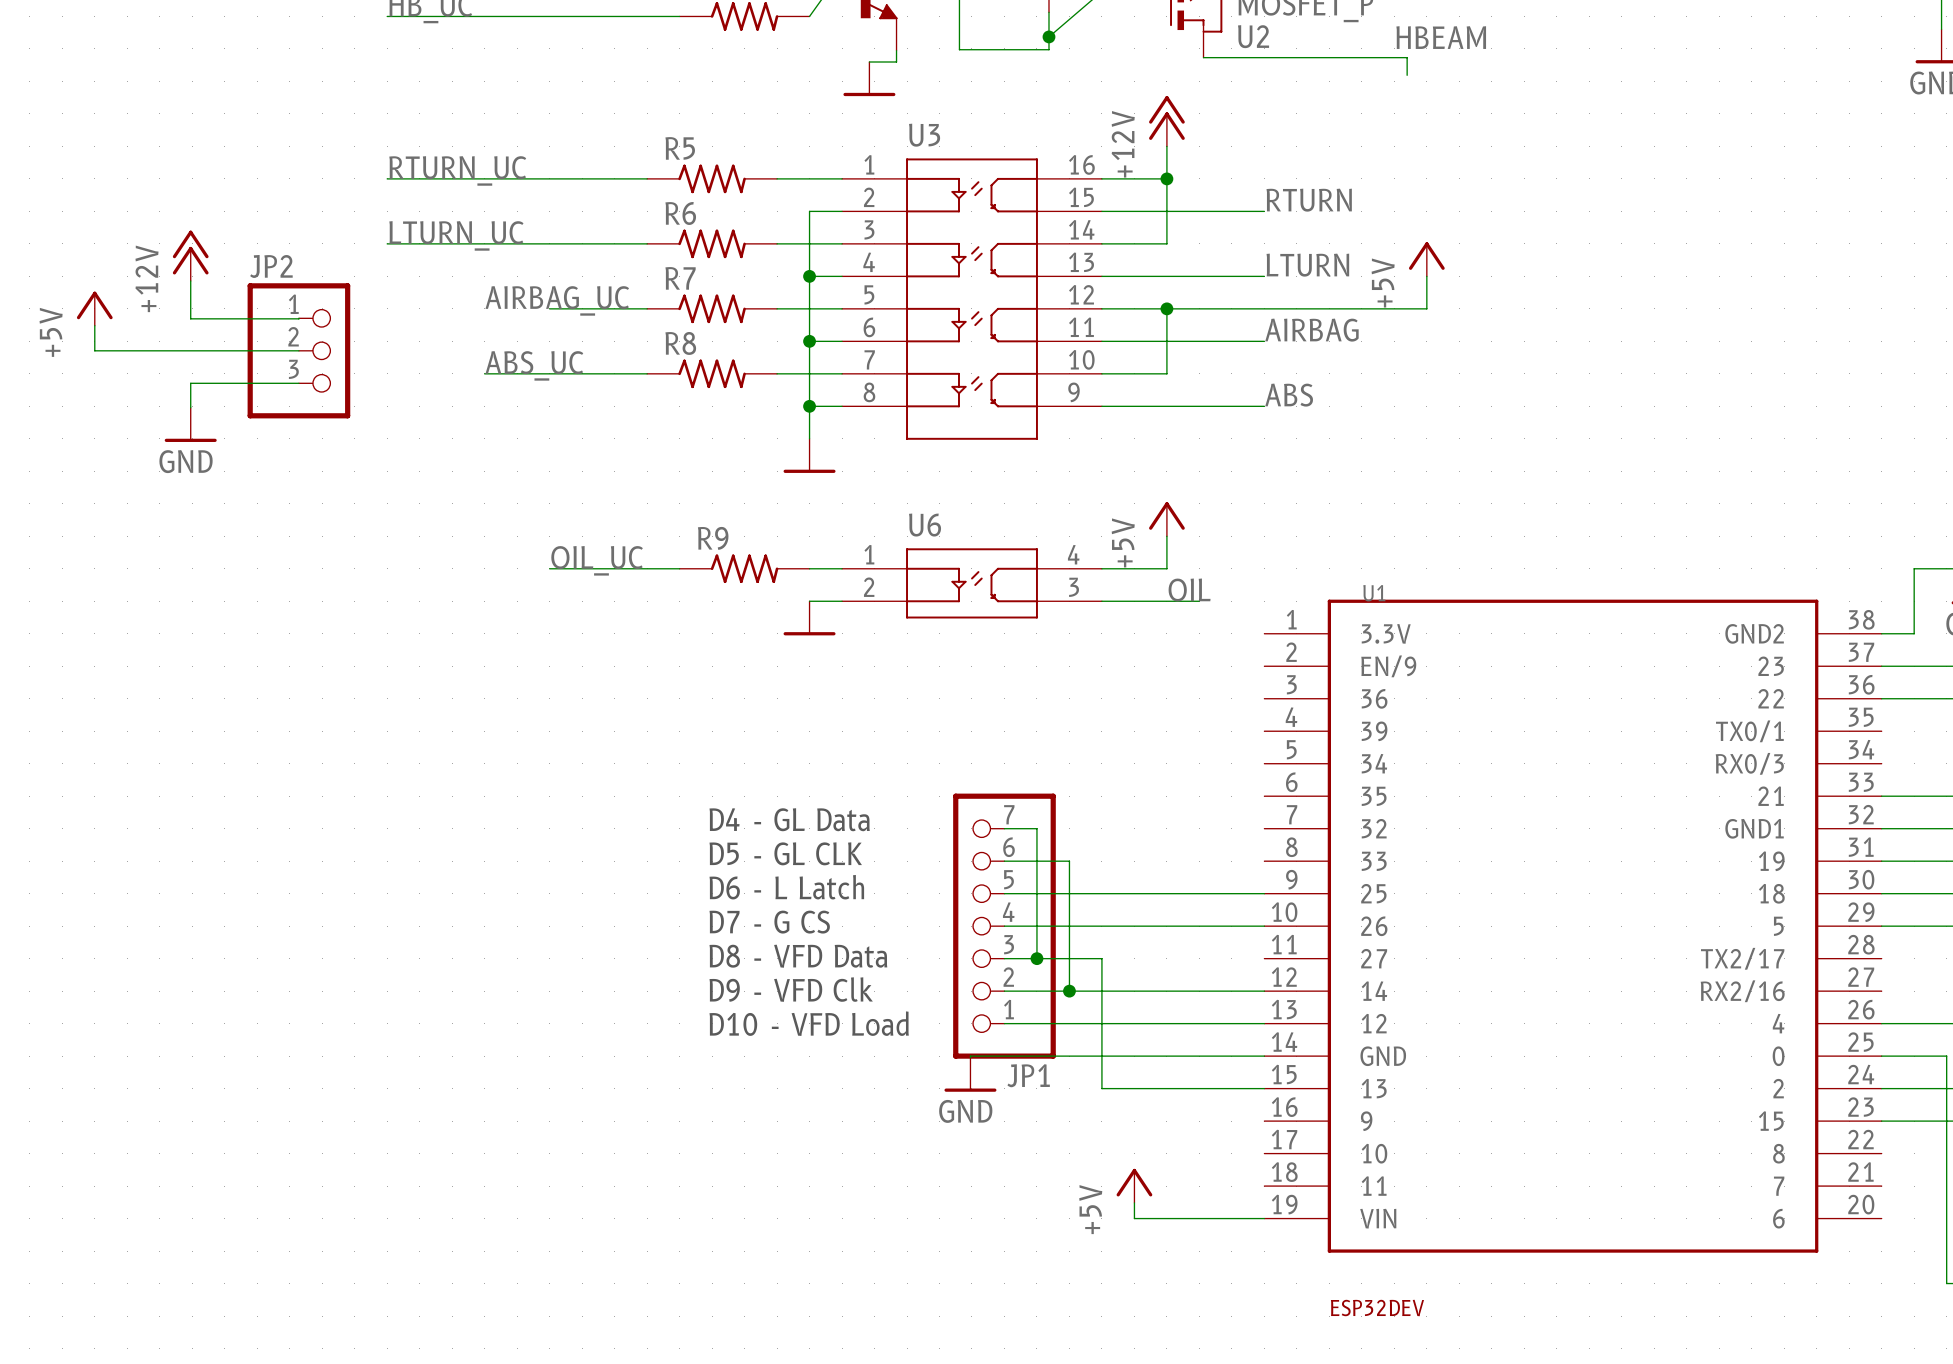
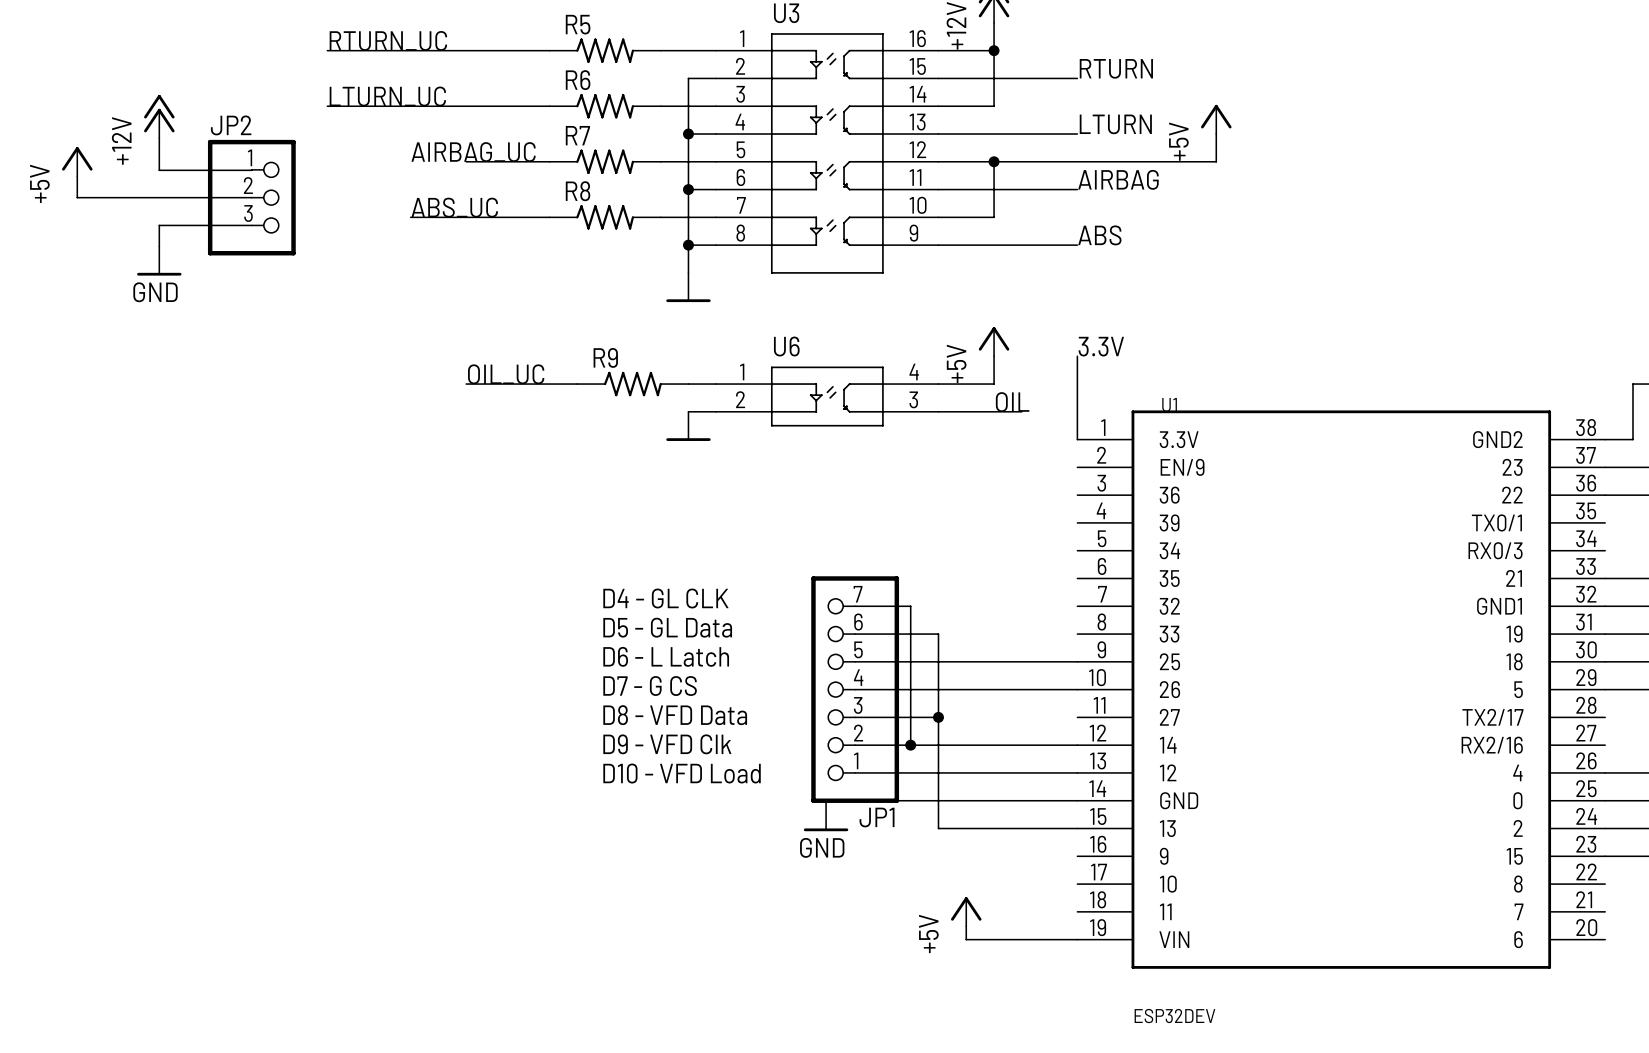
label: none -> 3.3V (1101, 346)
wire: none -> (1077, 356) (1077, 439)
text: D4 - GL Data (789, 819) -> D4 - GL CLK (665, 598)
wire: (1036, 828) (1036, 958) -> (882, 606) (910, 606) (910, 634) (938, 634) (938, 717)
text: D5 - GL CLK (785, 853) -> D5 - GL Data (667, 627)
junction position: (1036, 958) -> (938, 717)

